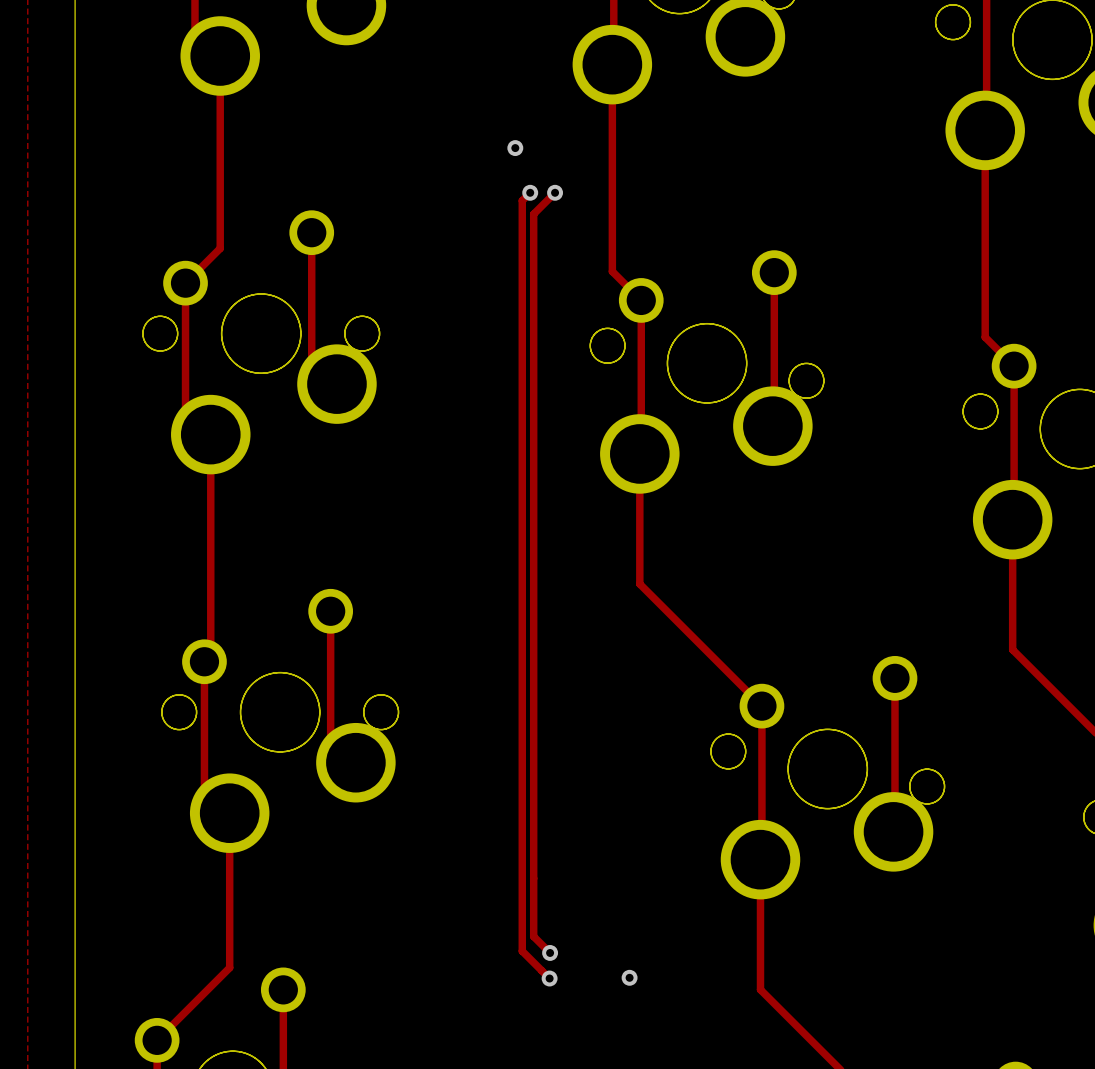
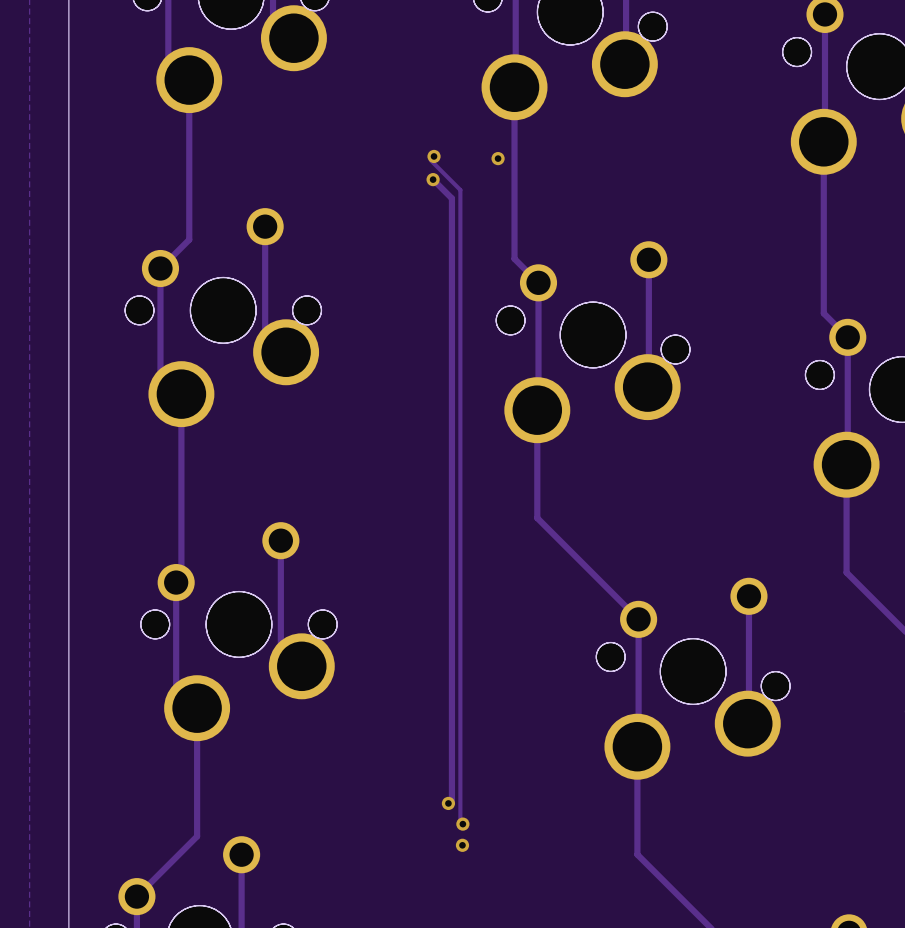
via: none -> (498, 158)
track: none -> (431, 160) (460, 190) (460, 824)
track: none -> (433, 179) (451, 198) (451, 799) (448, 803)
via: none -> (433, 179)
track: (530, 192) (522, 200) (522, 951) (549, 978) -> none
via: (530, 192) -> none
track: (555, 192) (533, 214) (533, 936) (550, 952) -> none
via: (555, 192) -> none
via position: (629, 977) -> (448, 803)

